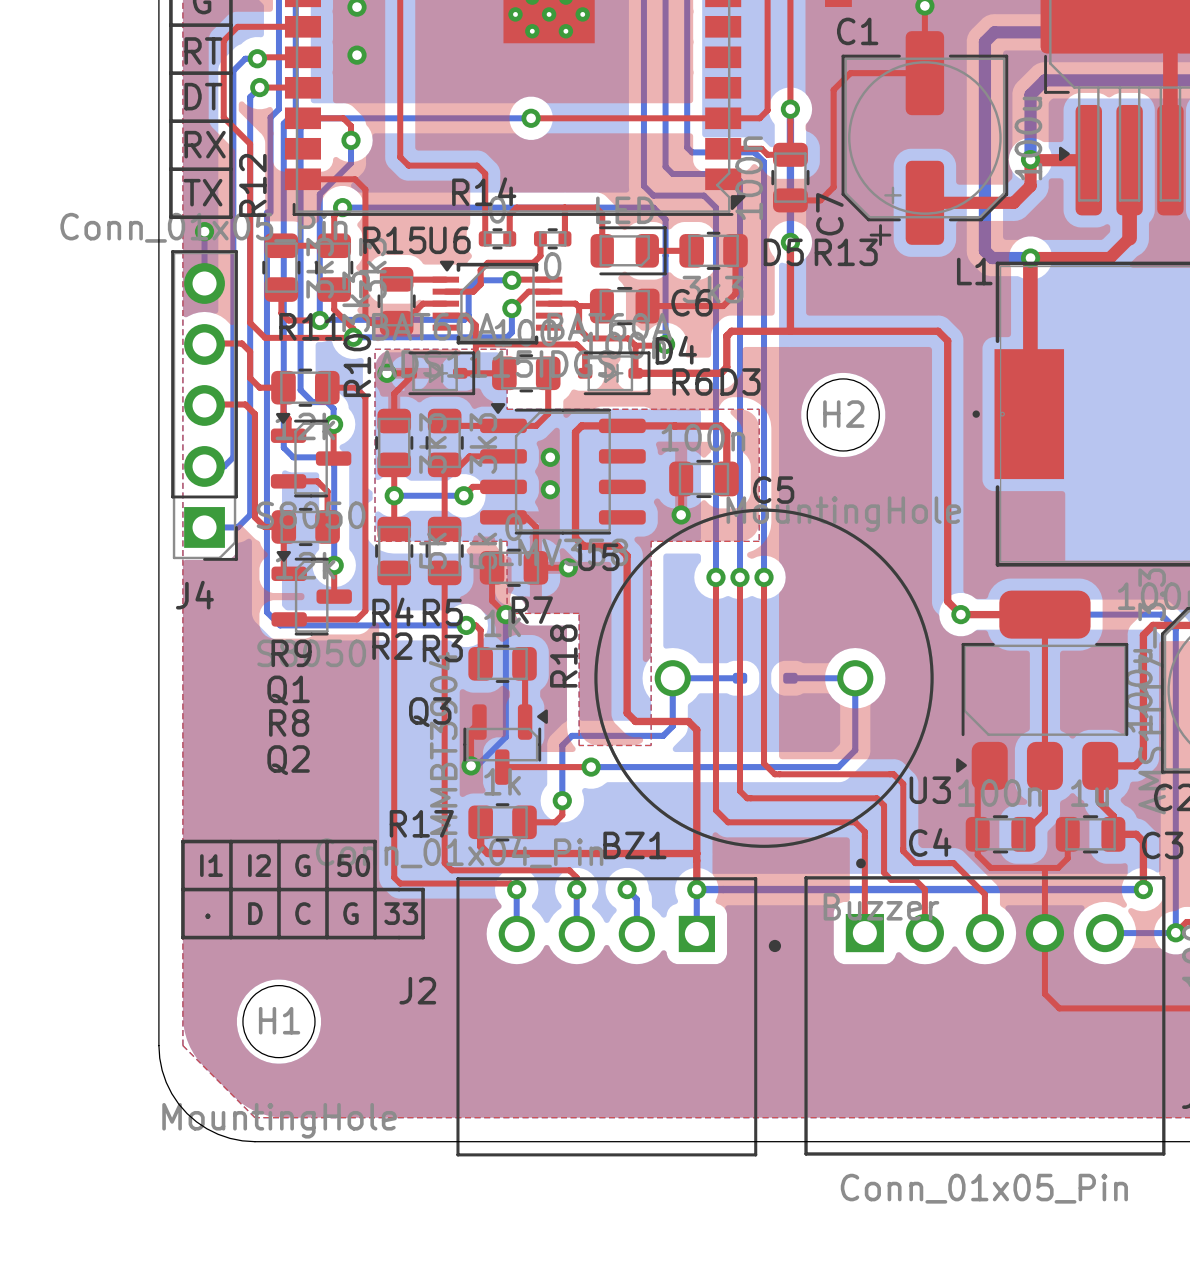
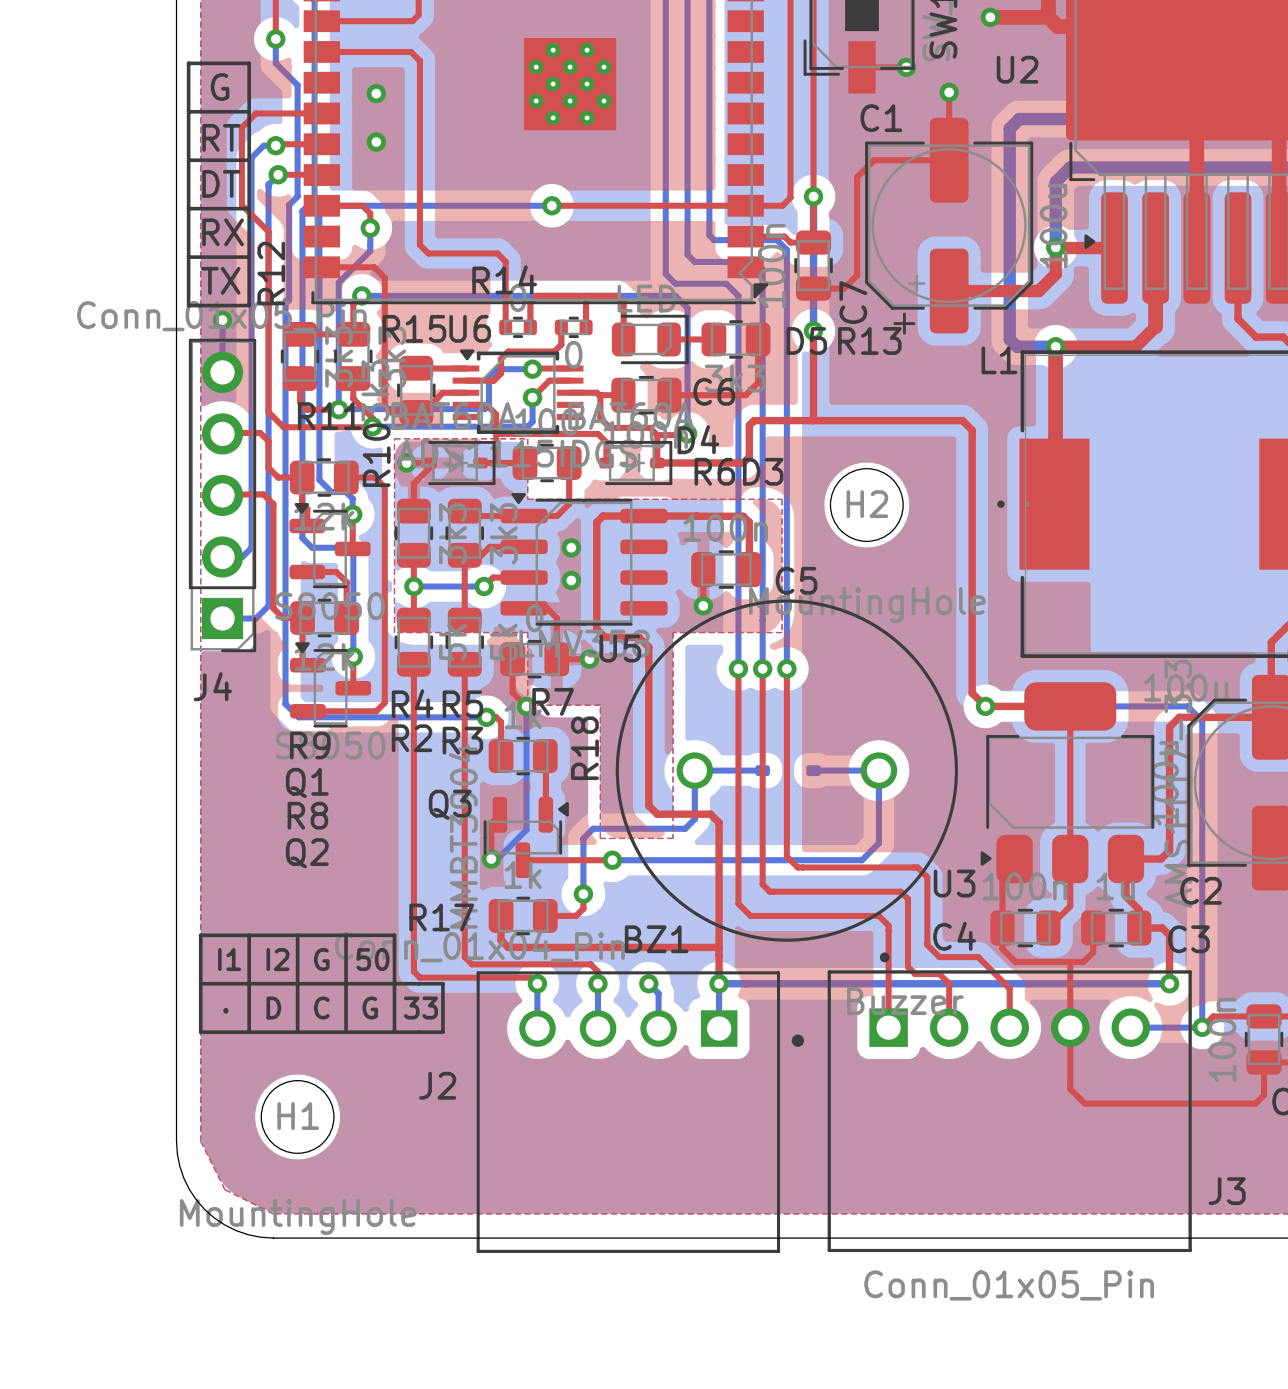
top zone outline: (182, 1045) (254, 1117) -> (200, 1141) (224, 1189) (273, 1213)

